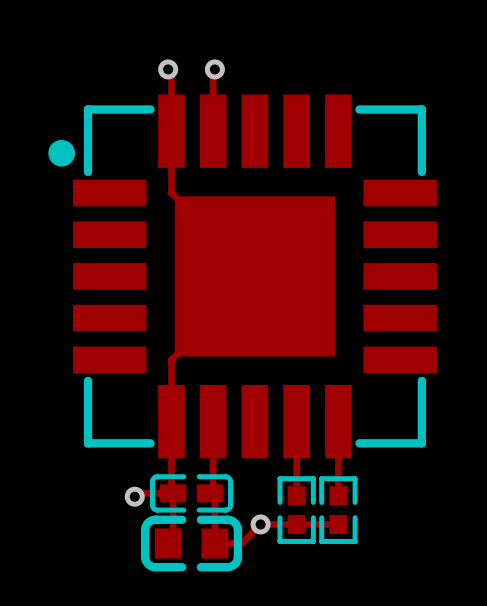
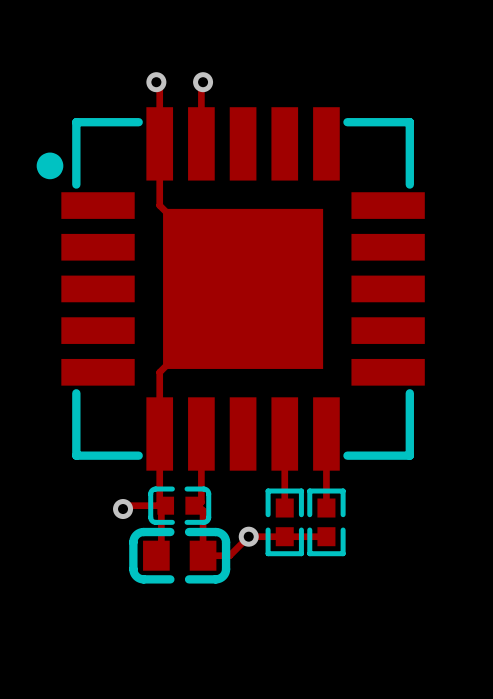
part footprint: [149, 474, 234, 513] -> [148, 486, 212, 525]

